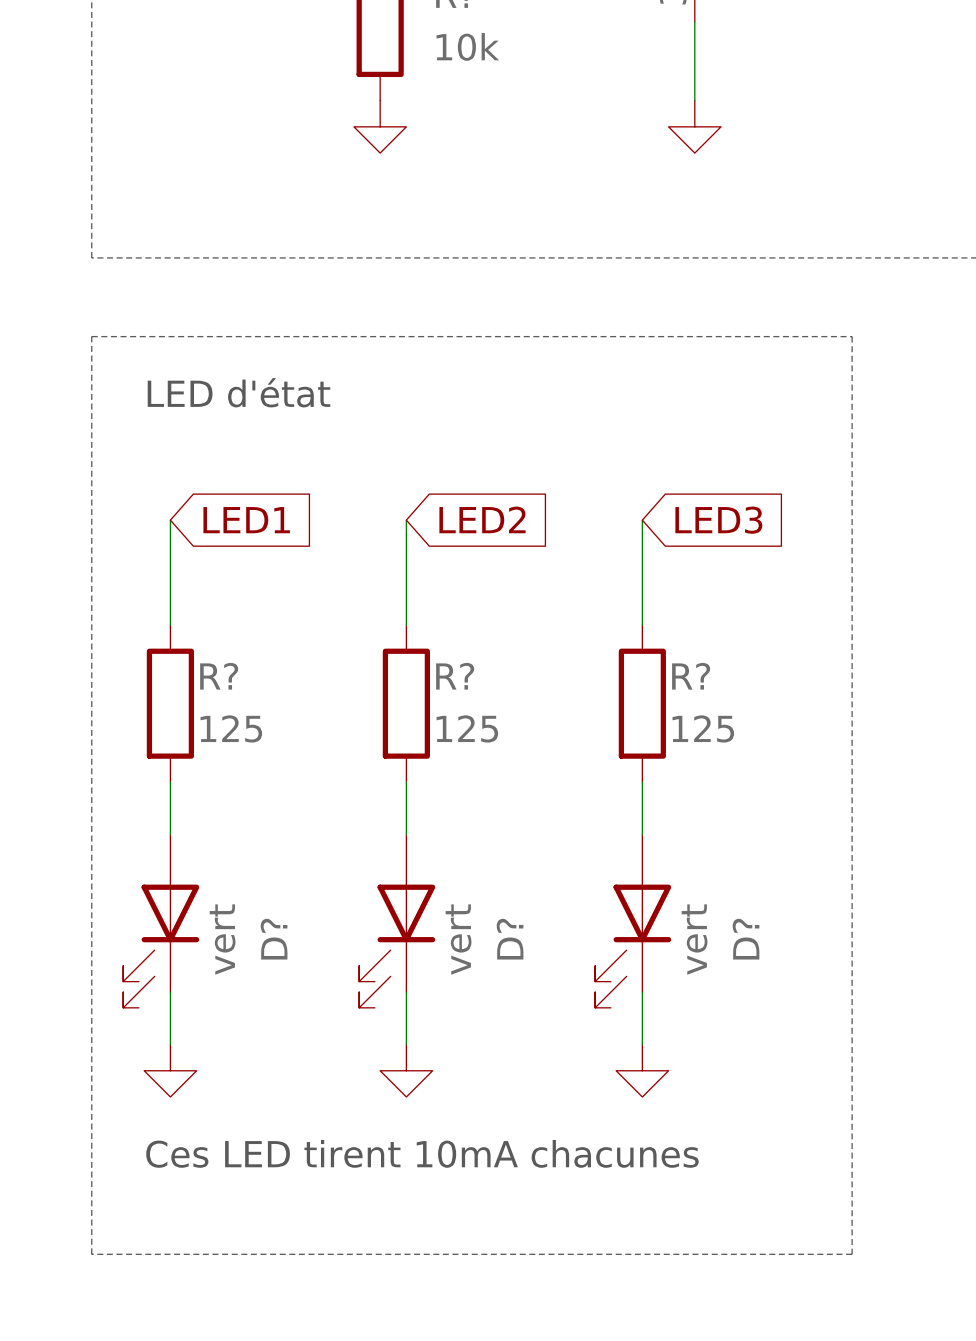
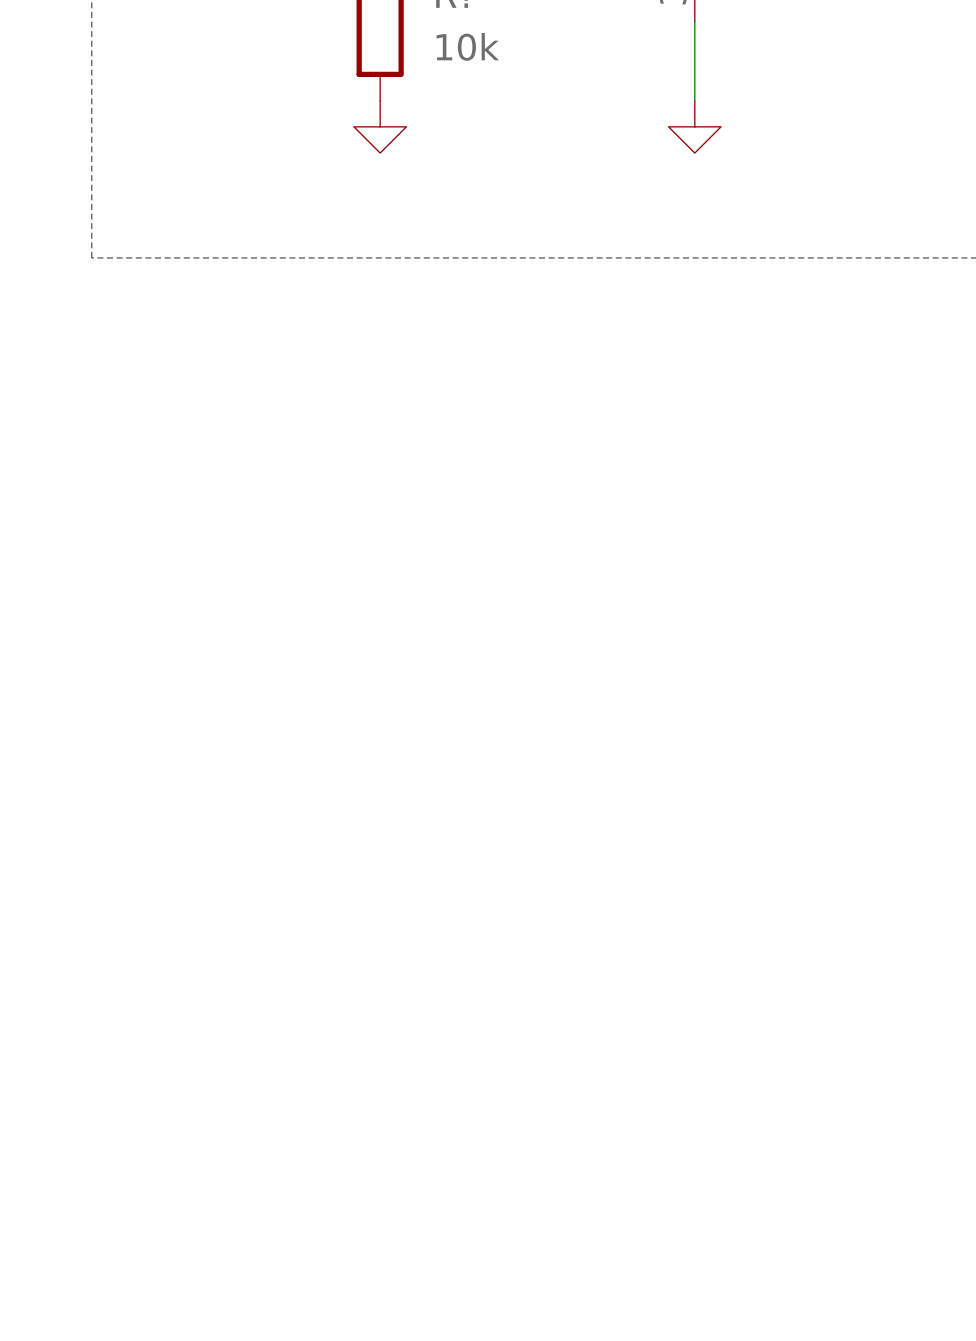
line: (91, 336) (852, 336) (852, 1254) (91, 1254) (91, 336) -> none
text: LED d'état (239, 392) -> none
global label: LED2 (482, 519) -> none
wire: (170, 520) (170, 625) -> none
global label: LED1 (246, 520) -> none
wire: (406, 520) (406, 625) -> none
wire: (642, 520) (642, 625) -> none
global label: LED3 (718, 520) -> none
R?: 125 (170, 703) -> none
R?: 125 (406, 703) -> none
R?: 125 (642, 703) -> none
wire: (170, 782) (170, 834) -> none
wire: (406, 782) (406, 834) -> none
wire: (642, 782) (642, 834) -> none
D?: vert (161, 921) -> none
D?: vert (397, 921) -> none
D?: vert (633, 921) -> none
wire: (170, 992) (170, 1044) -> none
wire: (406, 992) (406, 1044) -> none
wire: (642, 992) (642, 1044) -> none
power symbol: (170, 1070) -> none
power symbol: (406, 1070) -> none
power symbol: (642, 1070) -> none
text: Ces LED tirent 10mA chacunes (422, 1153) -> none

